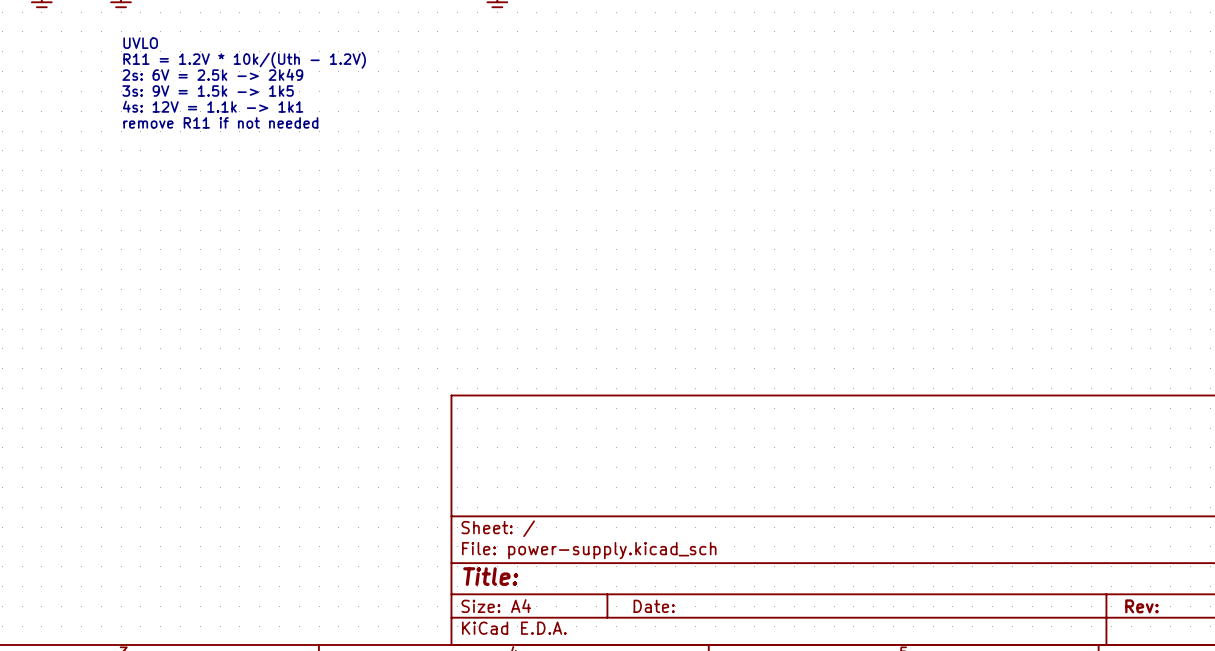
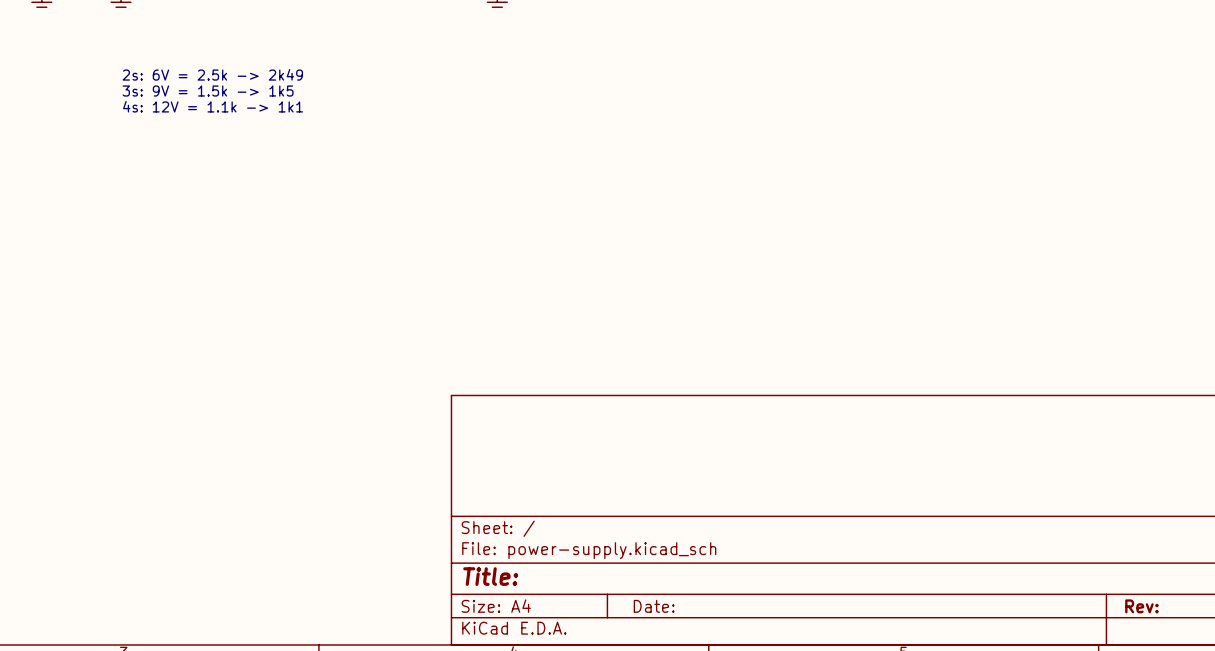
text: UVLO (140, 43) -> none
text: R11 = 1.2V * 10k/(Uth - 1.2V) (244, 60) -> none
text: remove R11 if not needed (220, 122) -> none

